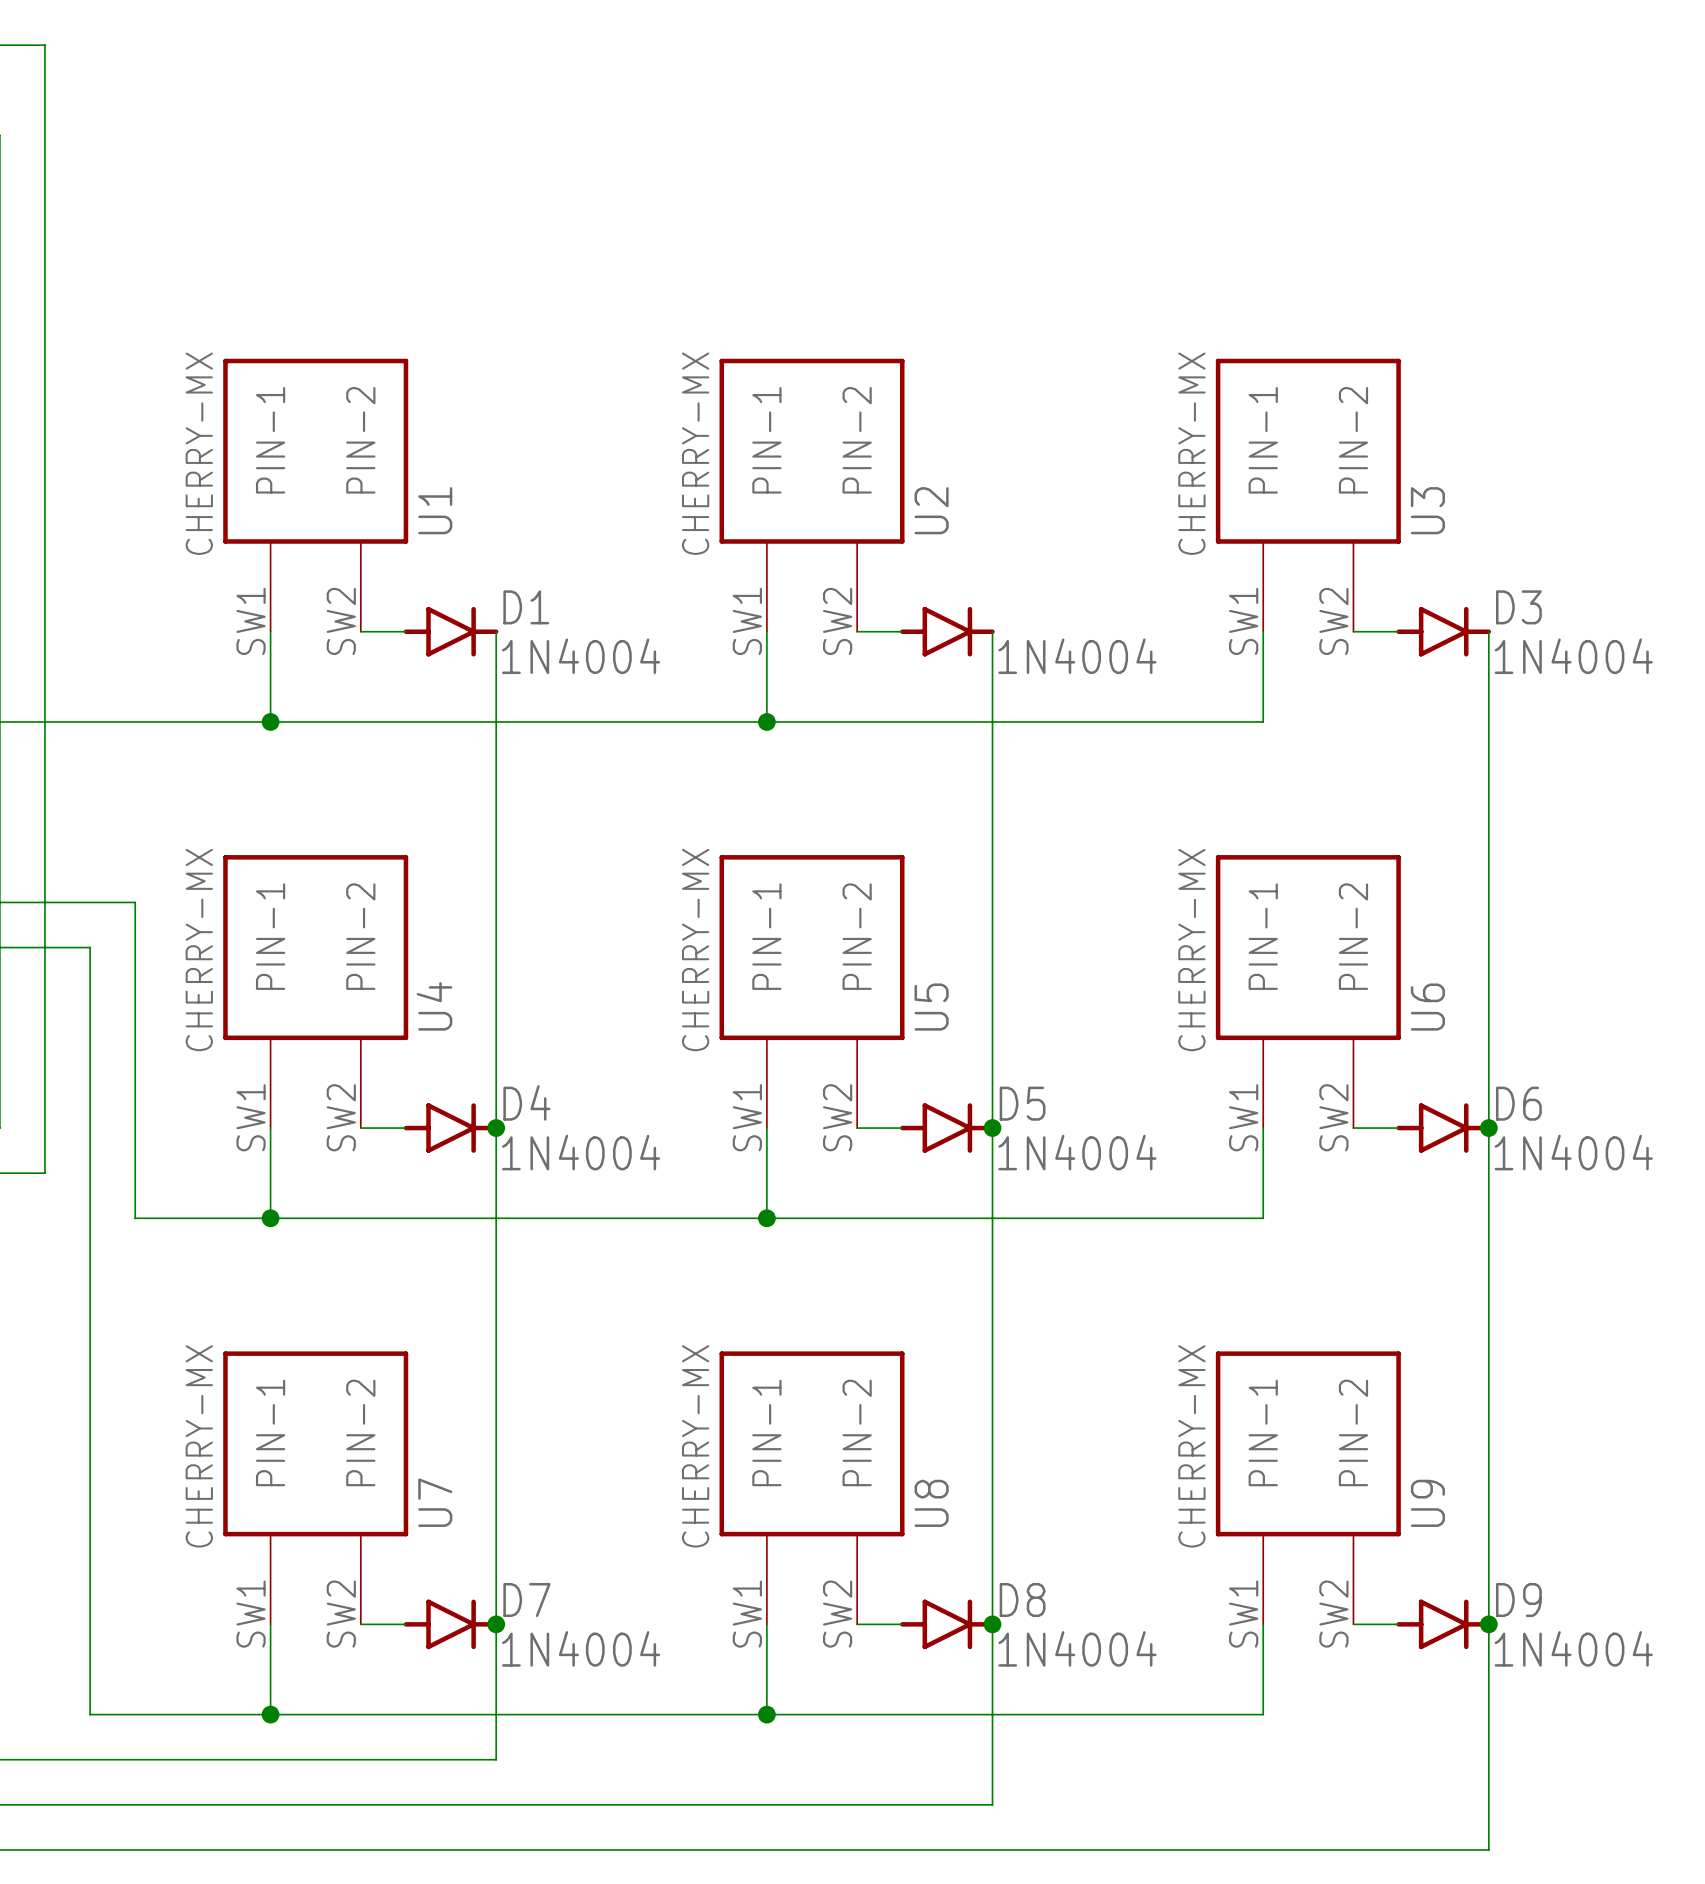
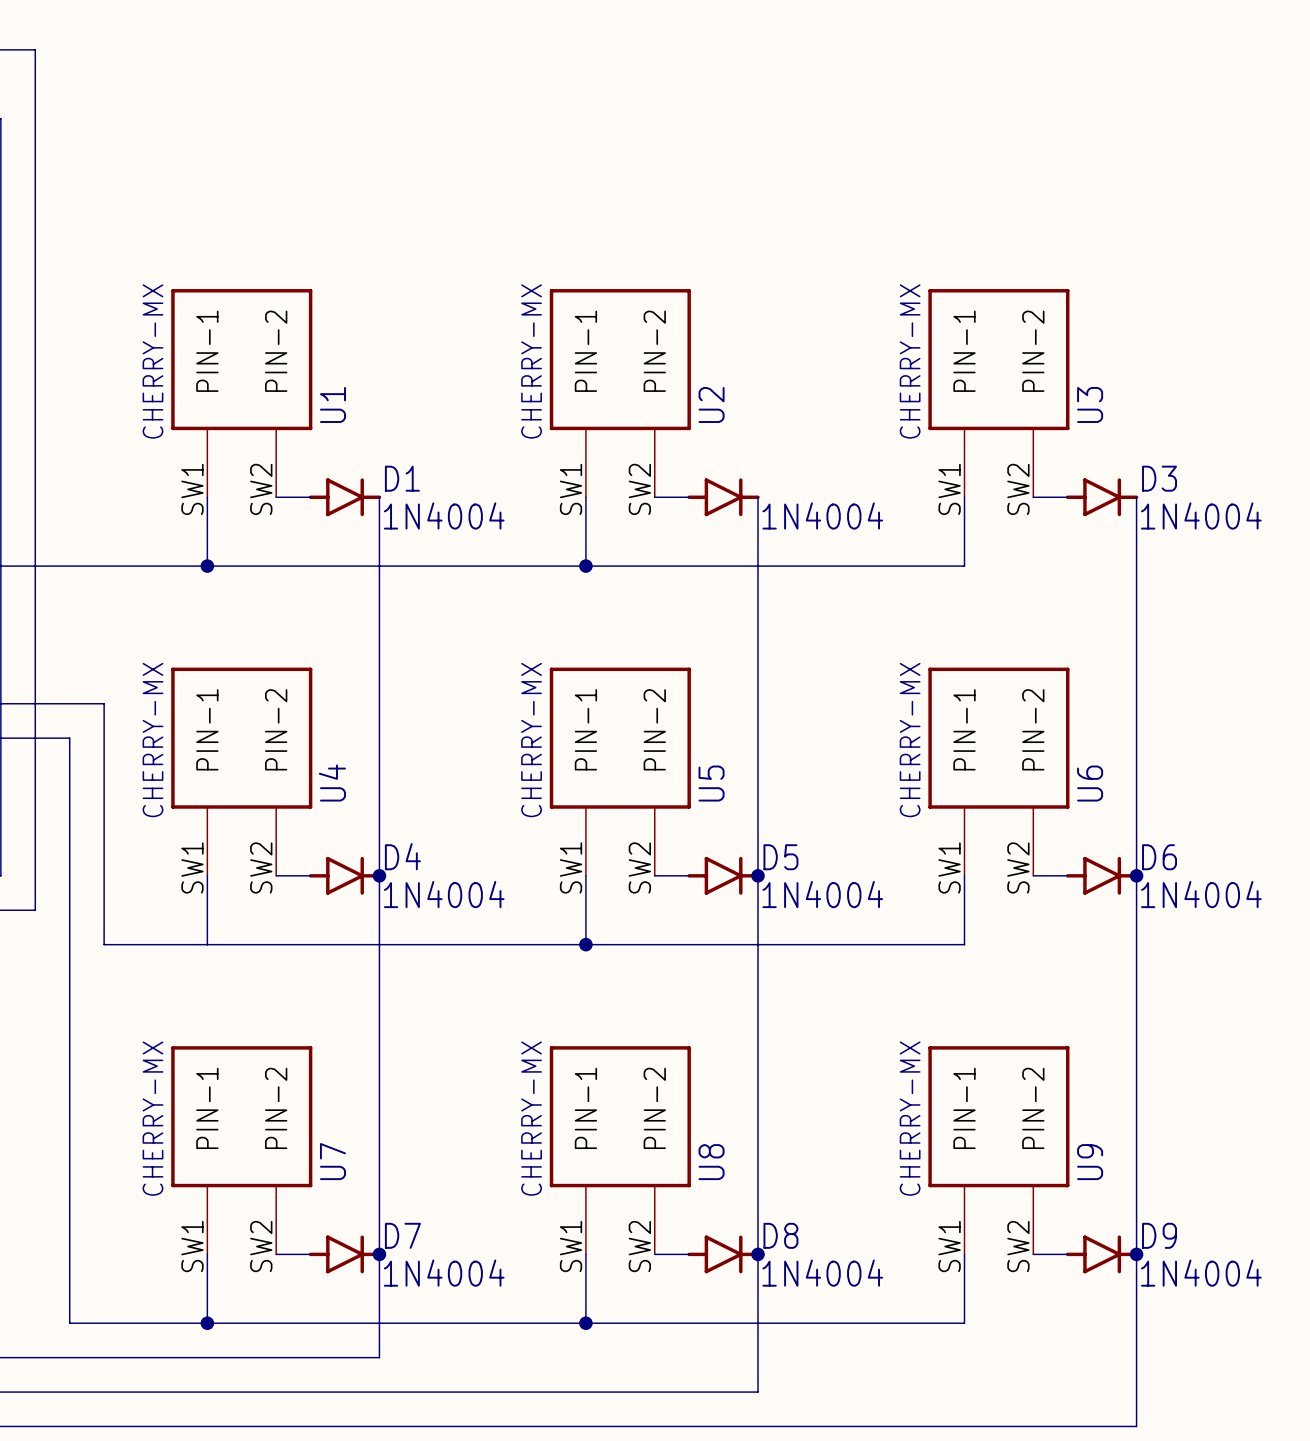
junction: (270, 1218) -> none

